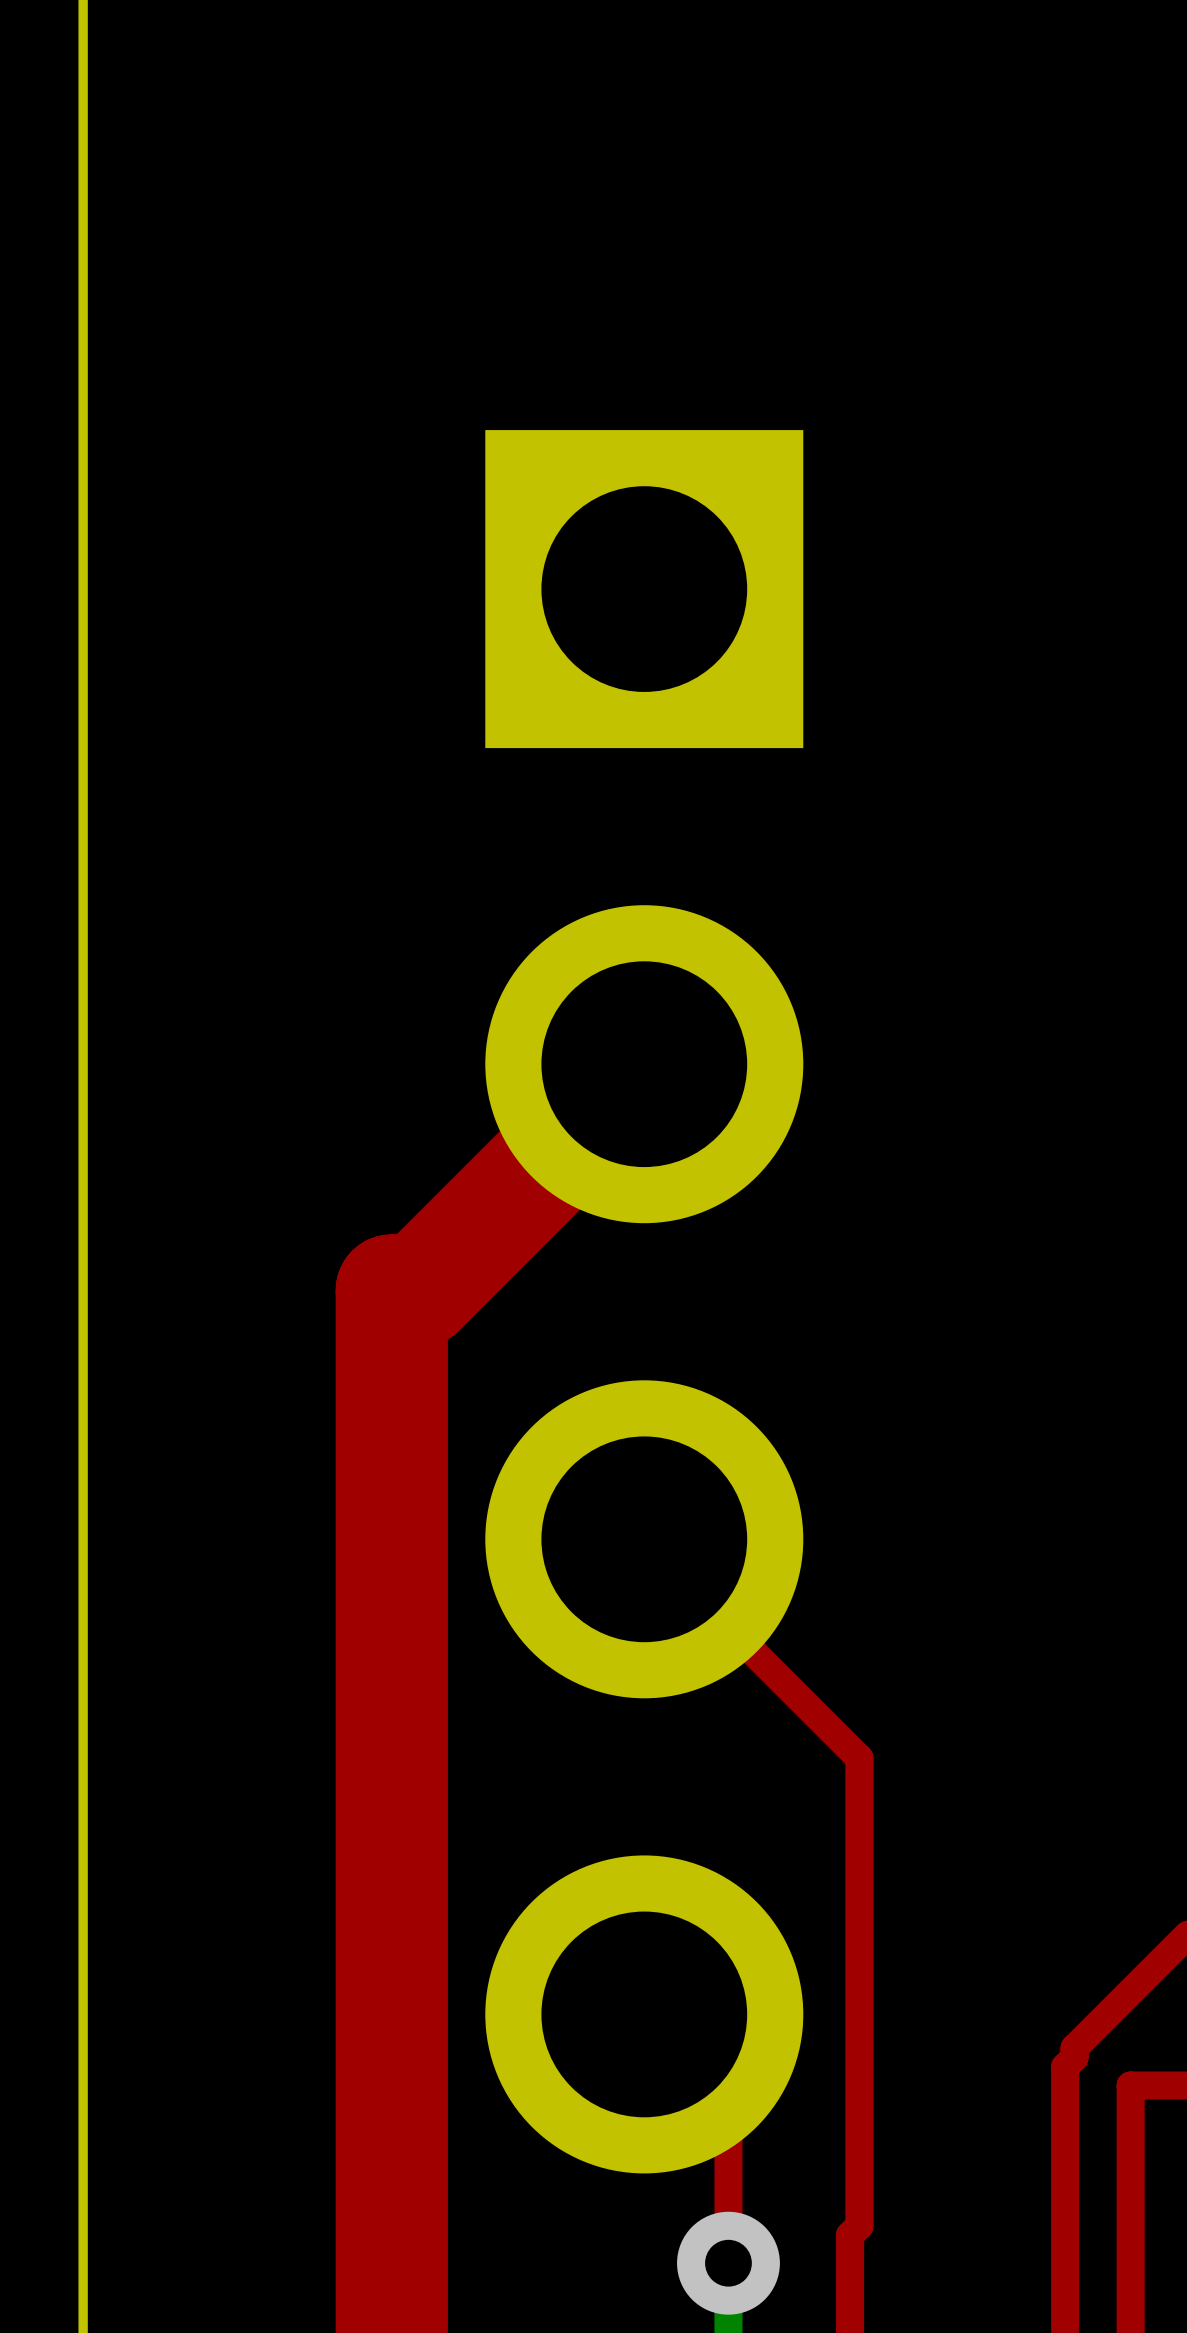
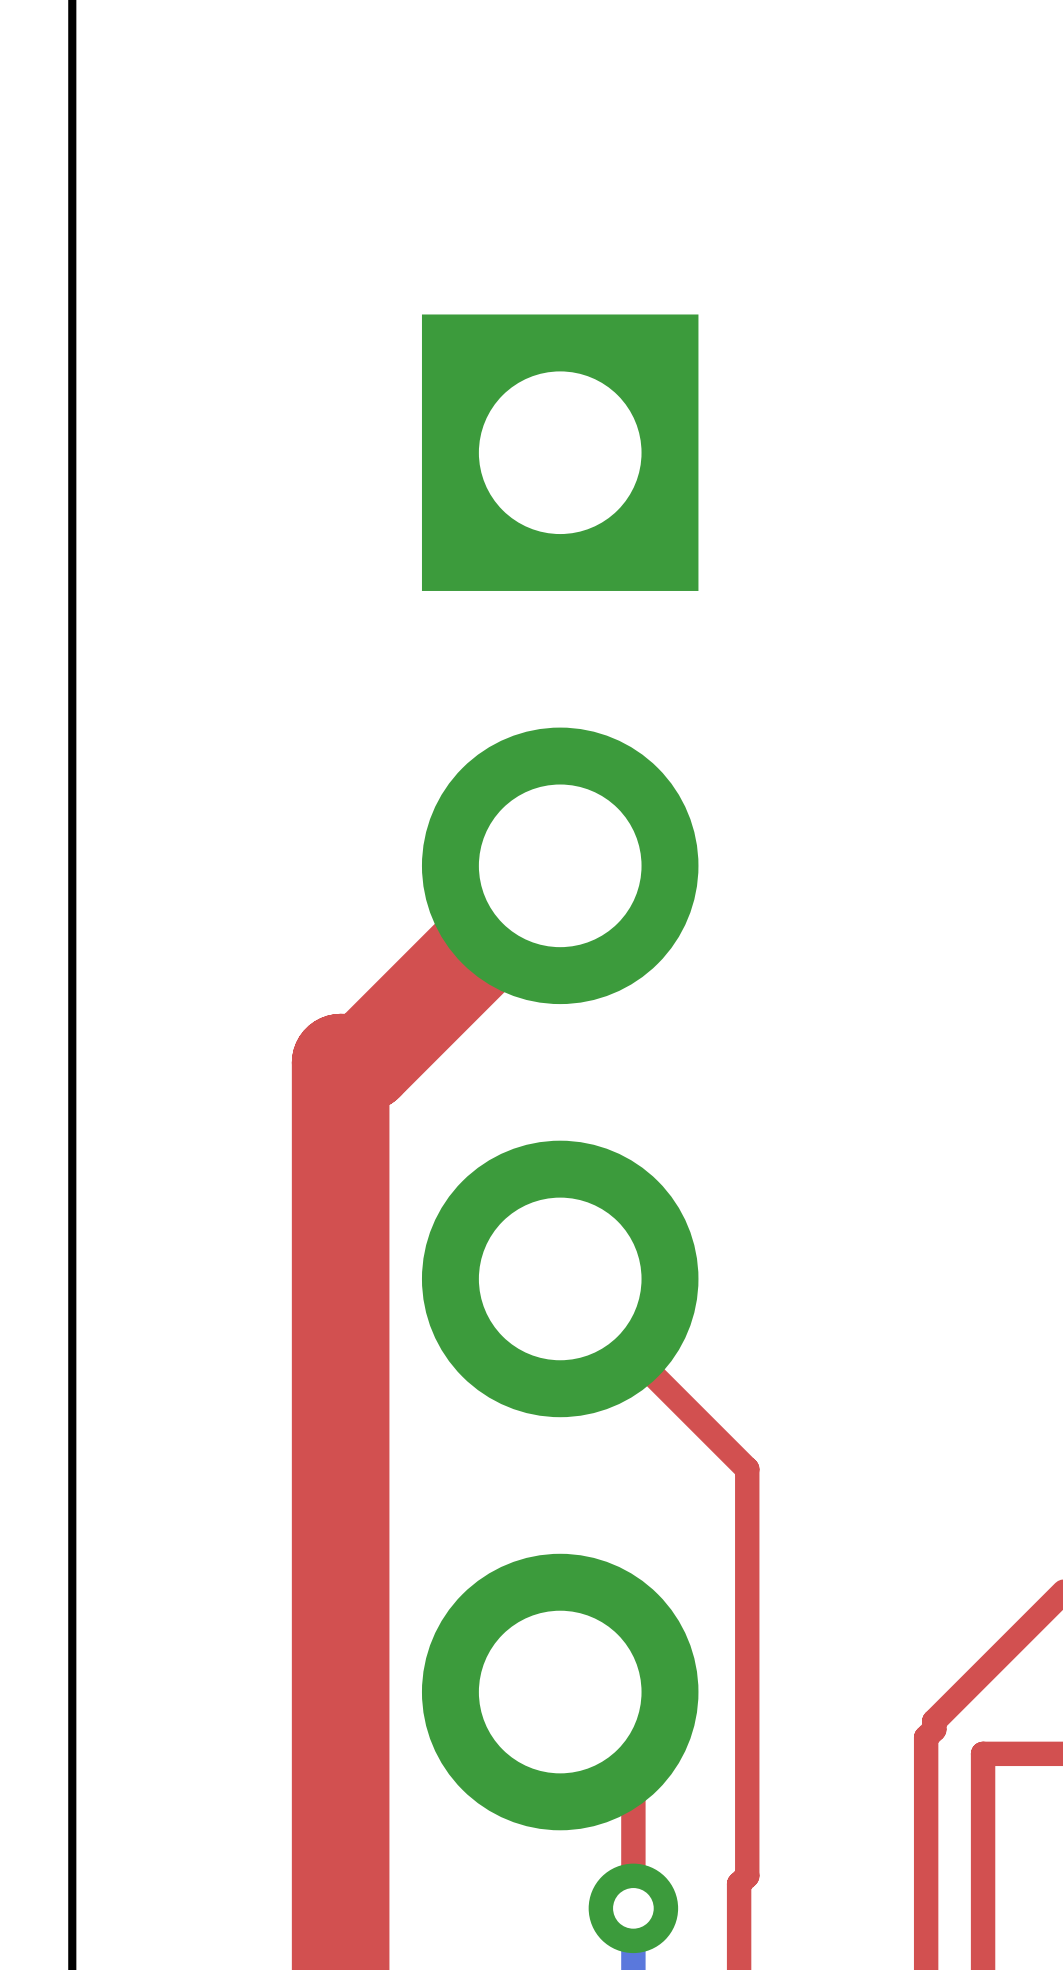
part footprint: [485, 430, 804, 2174] -> [421, 314, 699, 1831]

